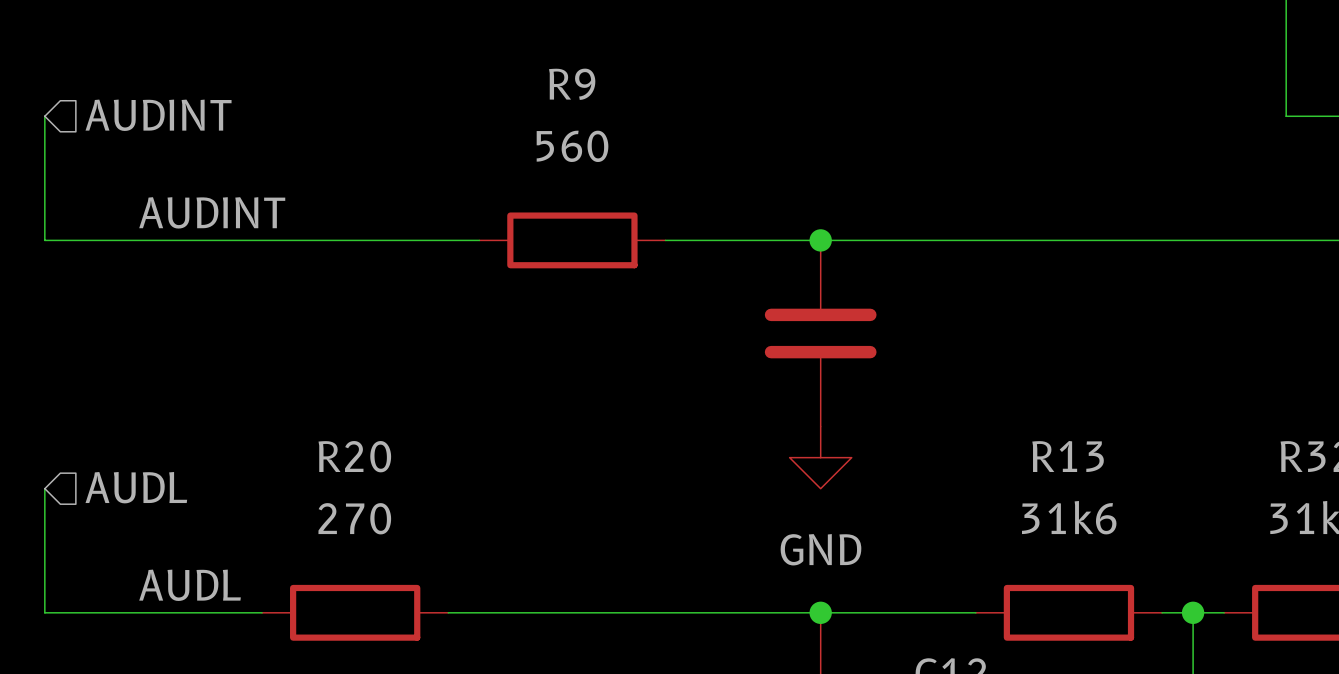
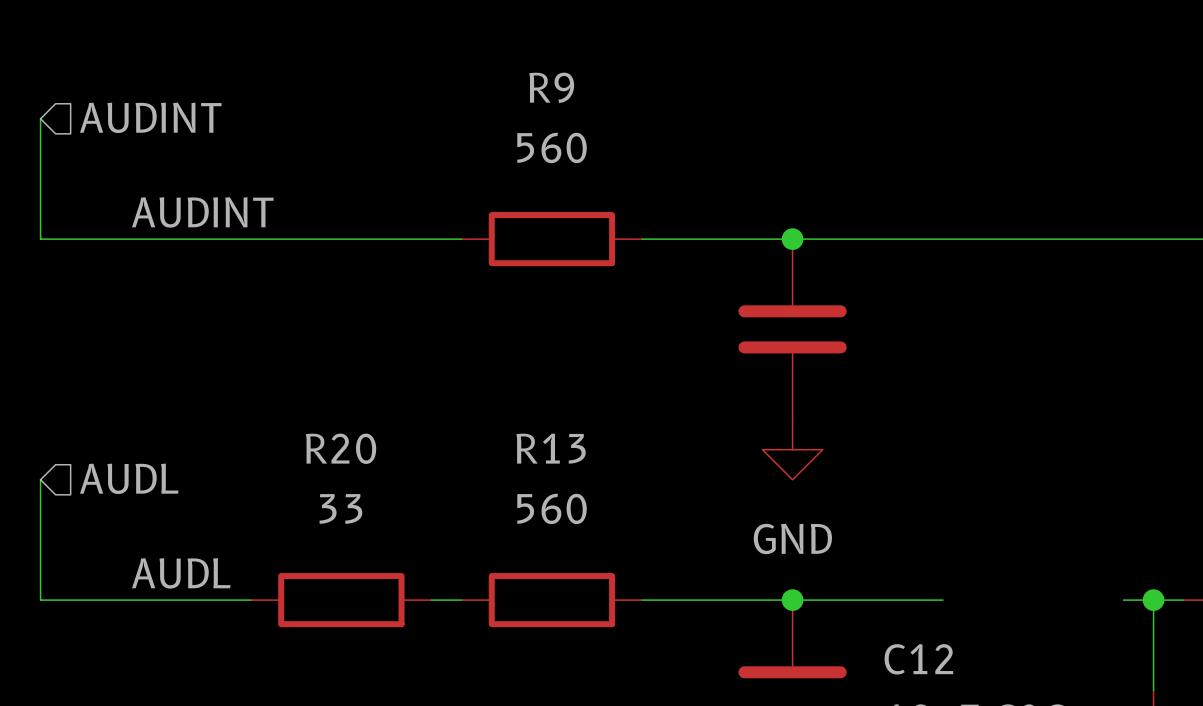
R13 value: 31k6 (1069, 517) -> 560 (552, 508)
R20 value: 270 (354, 518) -> 33 (340, 508)
wire: (479, 612) (665, 612) -> none
R13 position: (1068, 612) -> (551, 600)

